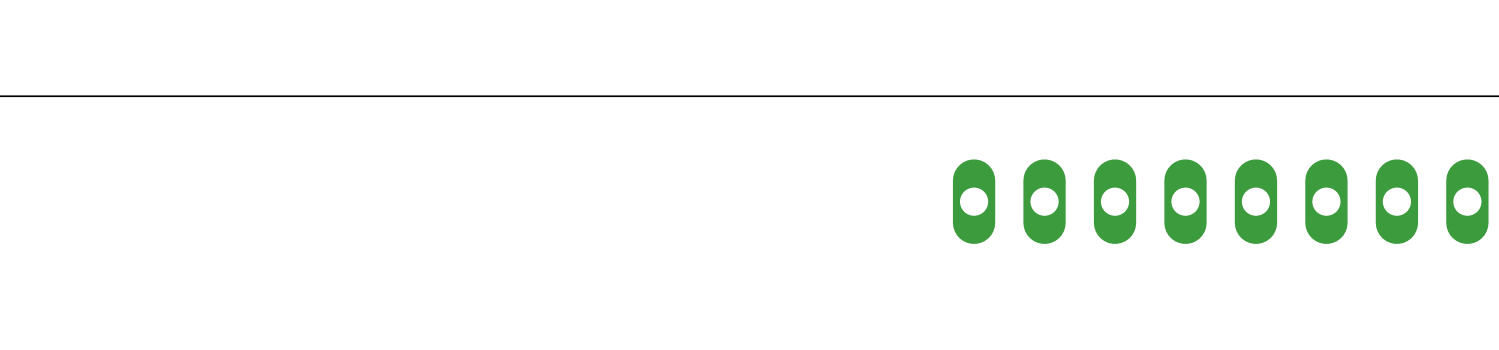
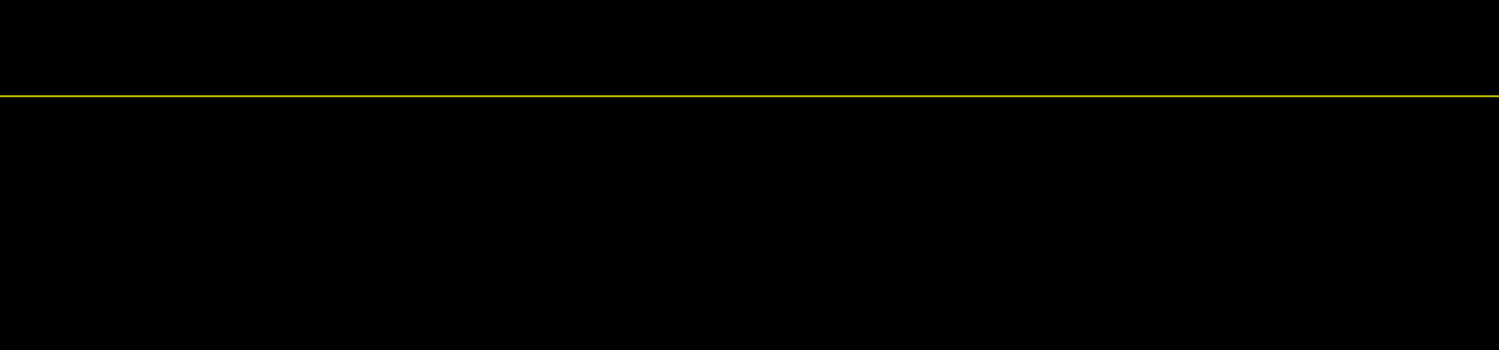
part: (1220, 201) -> none

